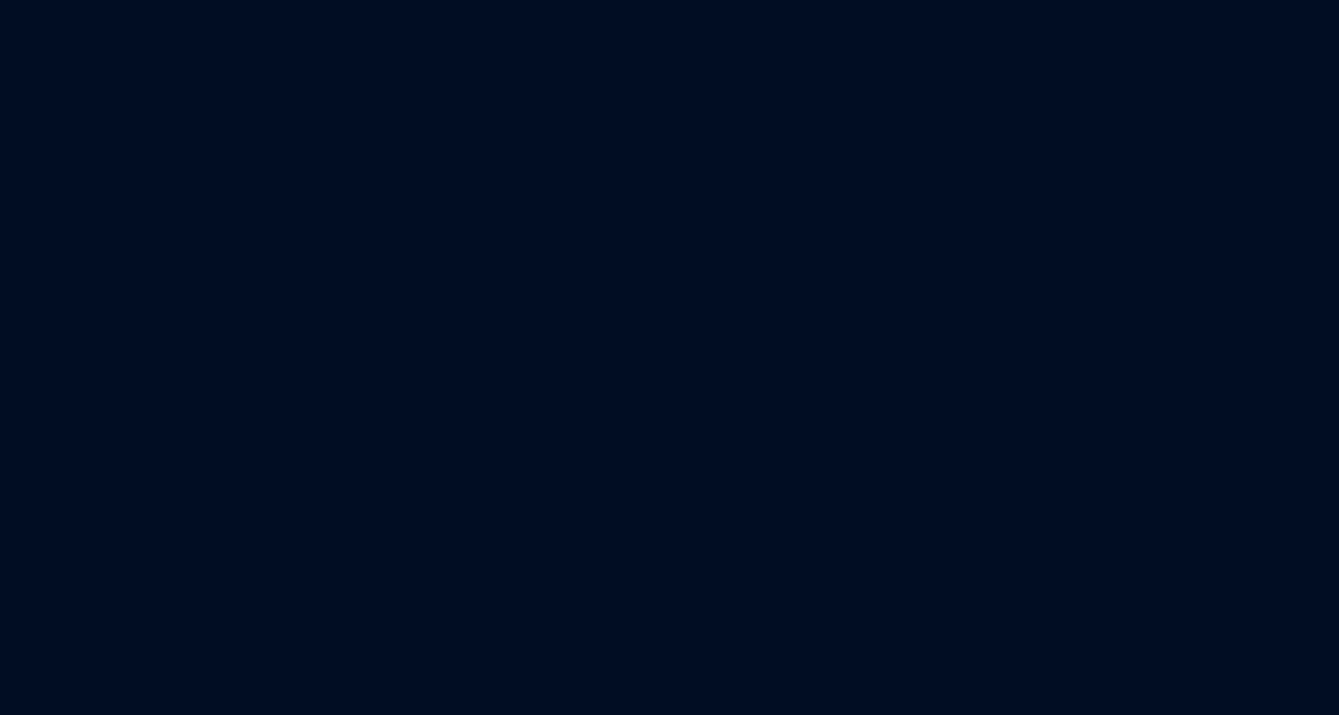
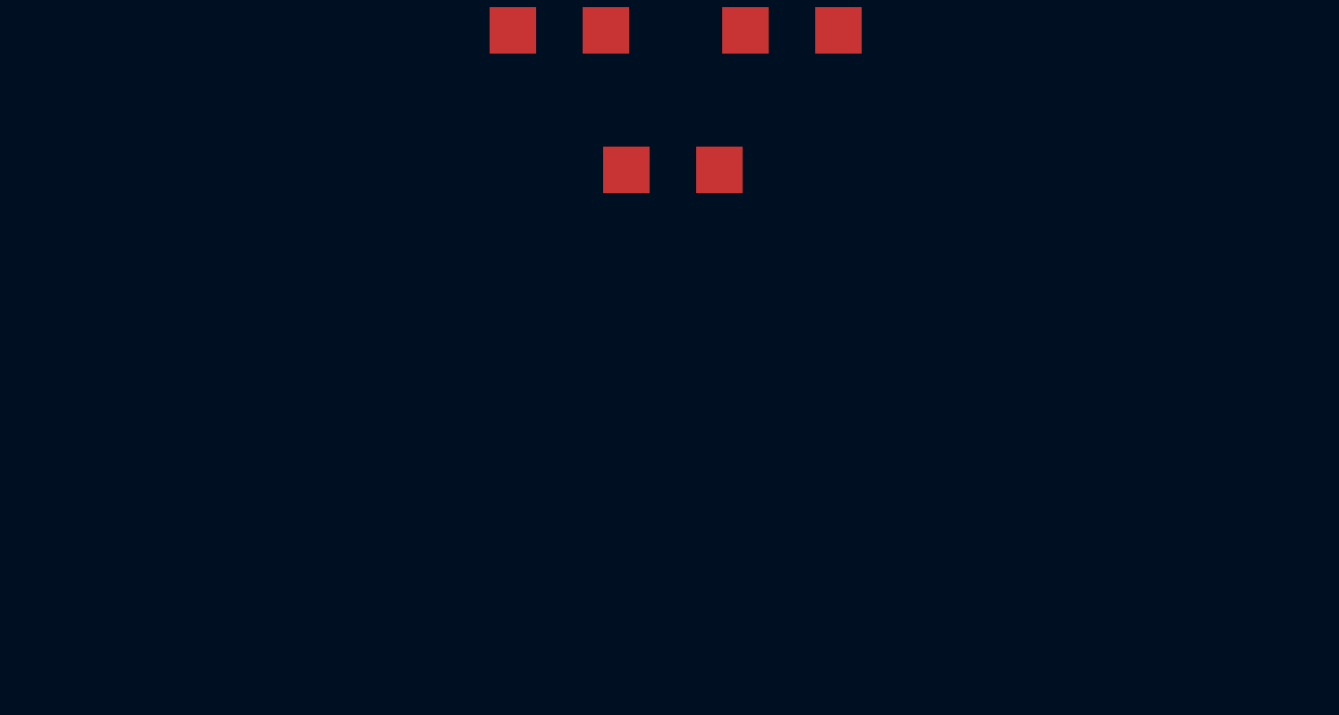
part: none -> (559, 30)
part: none -> (791, 30)
part: none -> (672, 169)

